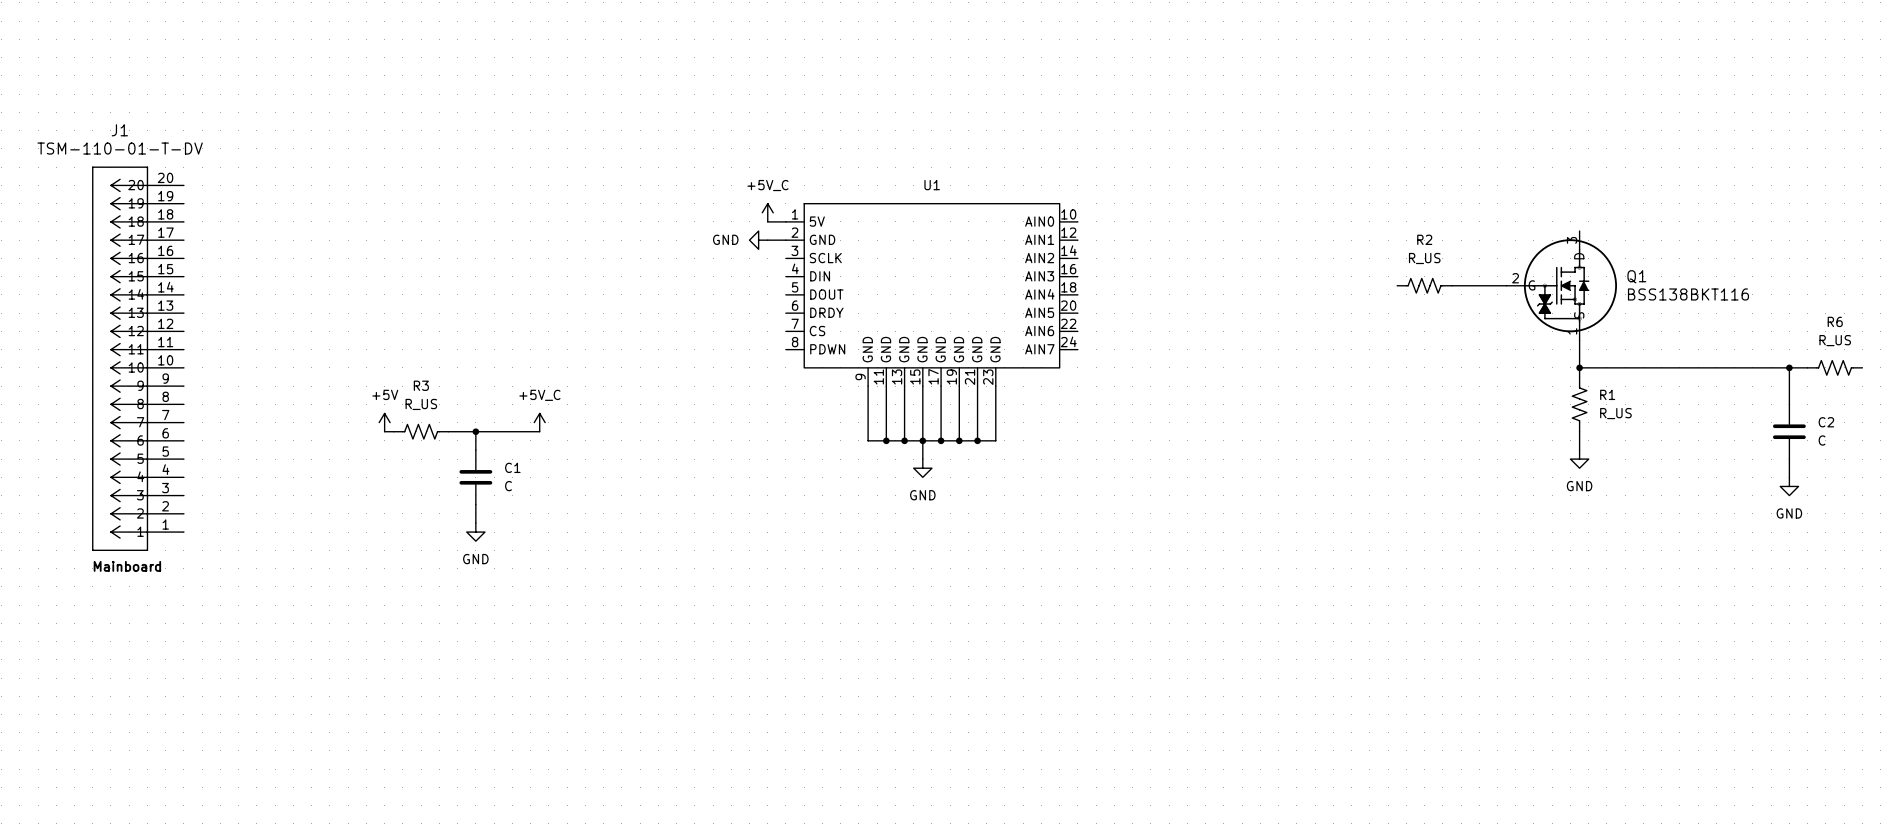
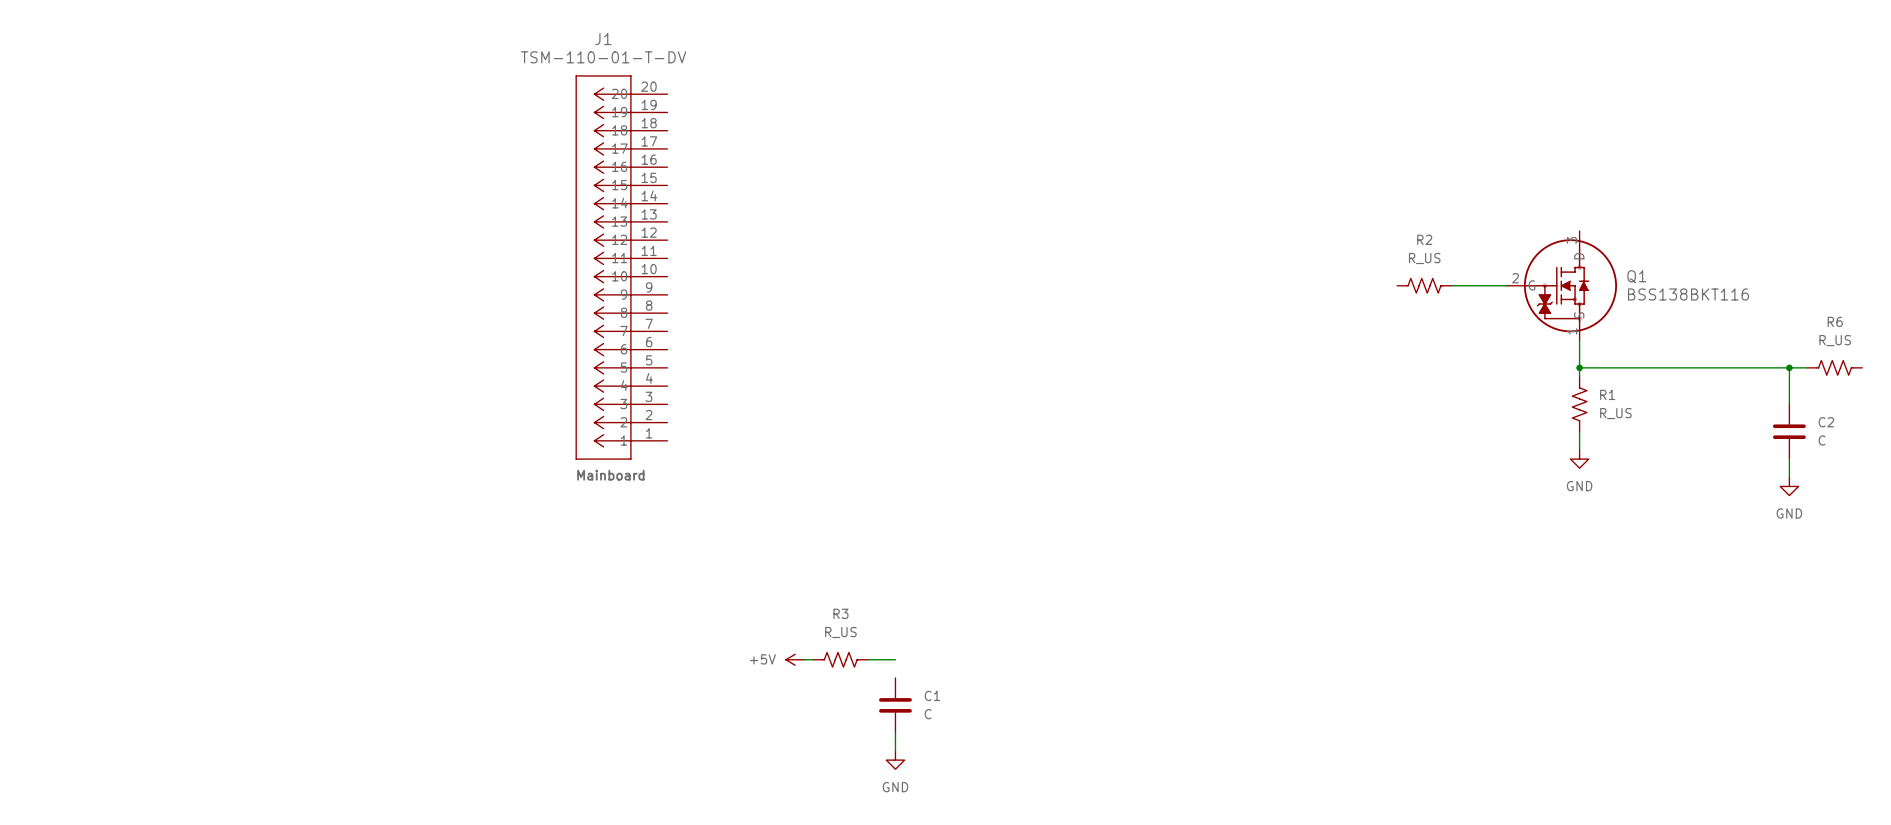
power symbol: +5V_C (767, 212) -> none
wire: (767, 221) (785, 221) -> none
power symbol: GND (758, 240) -> none
wire: (767, 240) (785, 240) -> none
U1: (931, 294) -> none
J1 position: (138, 358) -> (621, 267)
wire: (868, 386) (868, 440) (995, 440) (995, 386) -> none
wire: (886, 386) (886, 440) -> none
wire: (904, 386) (904, 440) -> none
wire: (922, 386) (922, 459) -> none
wire: (941, 386) (941, 440) -> none
wire: (959, 386) (959, 440) -> none
wire: (977, 386) (977, 440) -> none
power symbol: +5V (384, 422) -> none
power symbol: +5V_C (539, 422) -> none
wire: (384, 431) (393, 431) -> none
R3 position: (421, 431) -> (840, 659)
wire: (448, 431) (539, 431) -> none
wire: (475, 431) (475, 449) -> none
junction: (475, 431) -> none
junction: (886, 440) -> none
junction: (904, 440) -> none
junction: (922, 440) -> none
junction: (941, 440) -> none
junction: (959, 440) -> none
junction: (977, 440) -> none
power symbol: GND (922, 468) -> none
C1 position: (475, 477) -> (895, 705)
wire: (475, 504) (475, 522) -> none
power symbol: GND (475, 532) -> none
power symbol: none -> +5V (795, 659)
wire: none -> (804, 659) (813, 659)
wire: none -> (868, 659) (895, 659)
wire: none -> (895, 732) (895, 750)
power symbol: none -> GND (895, 760)

